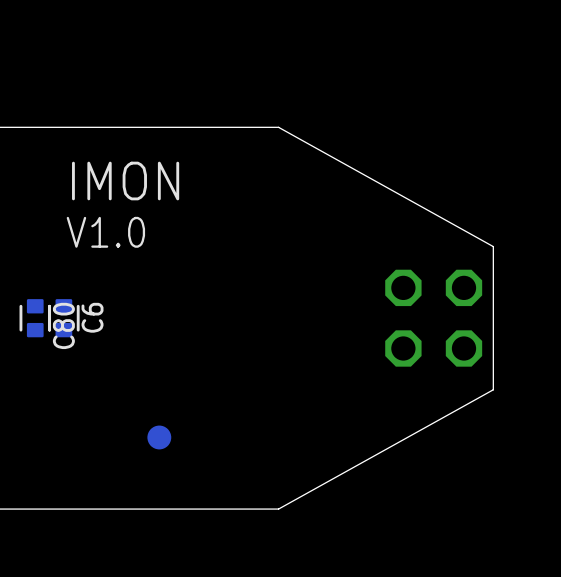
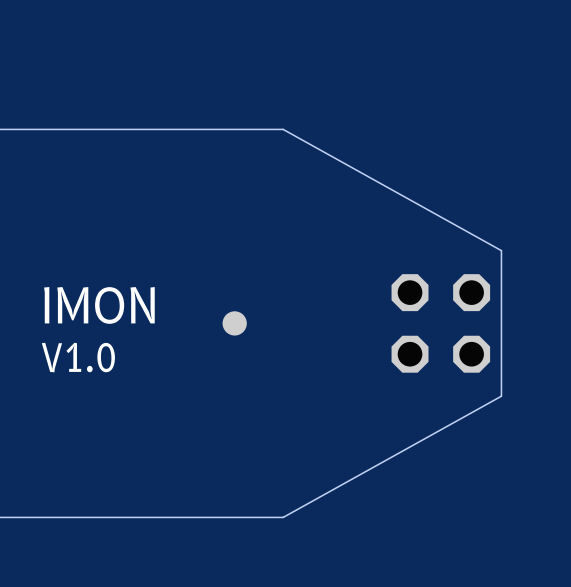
text position: IMON (125, 181) -> IMON (99, 305)
text position: V1.0 (105, 232) -> V1.0 (78, 357)
C80: (35, 318) -> none
C6: (63, 318) -> none
part position: (159, 437) -> (234, 323)

